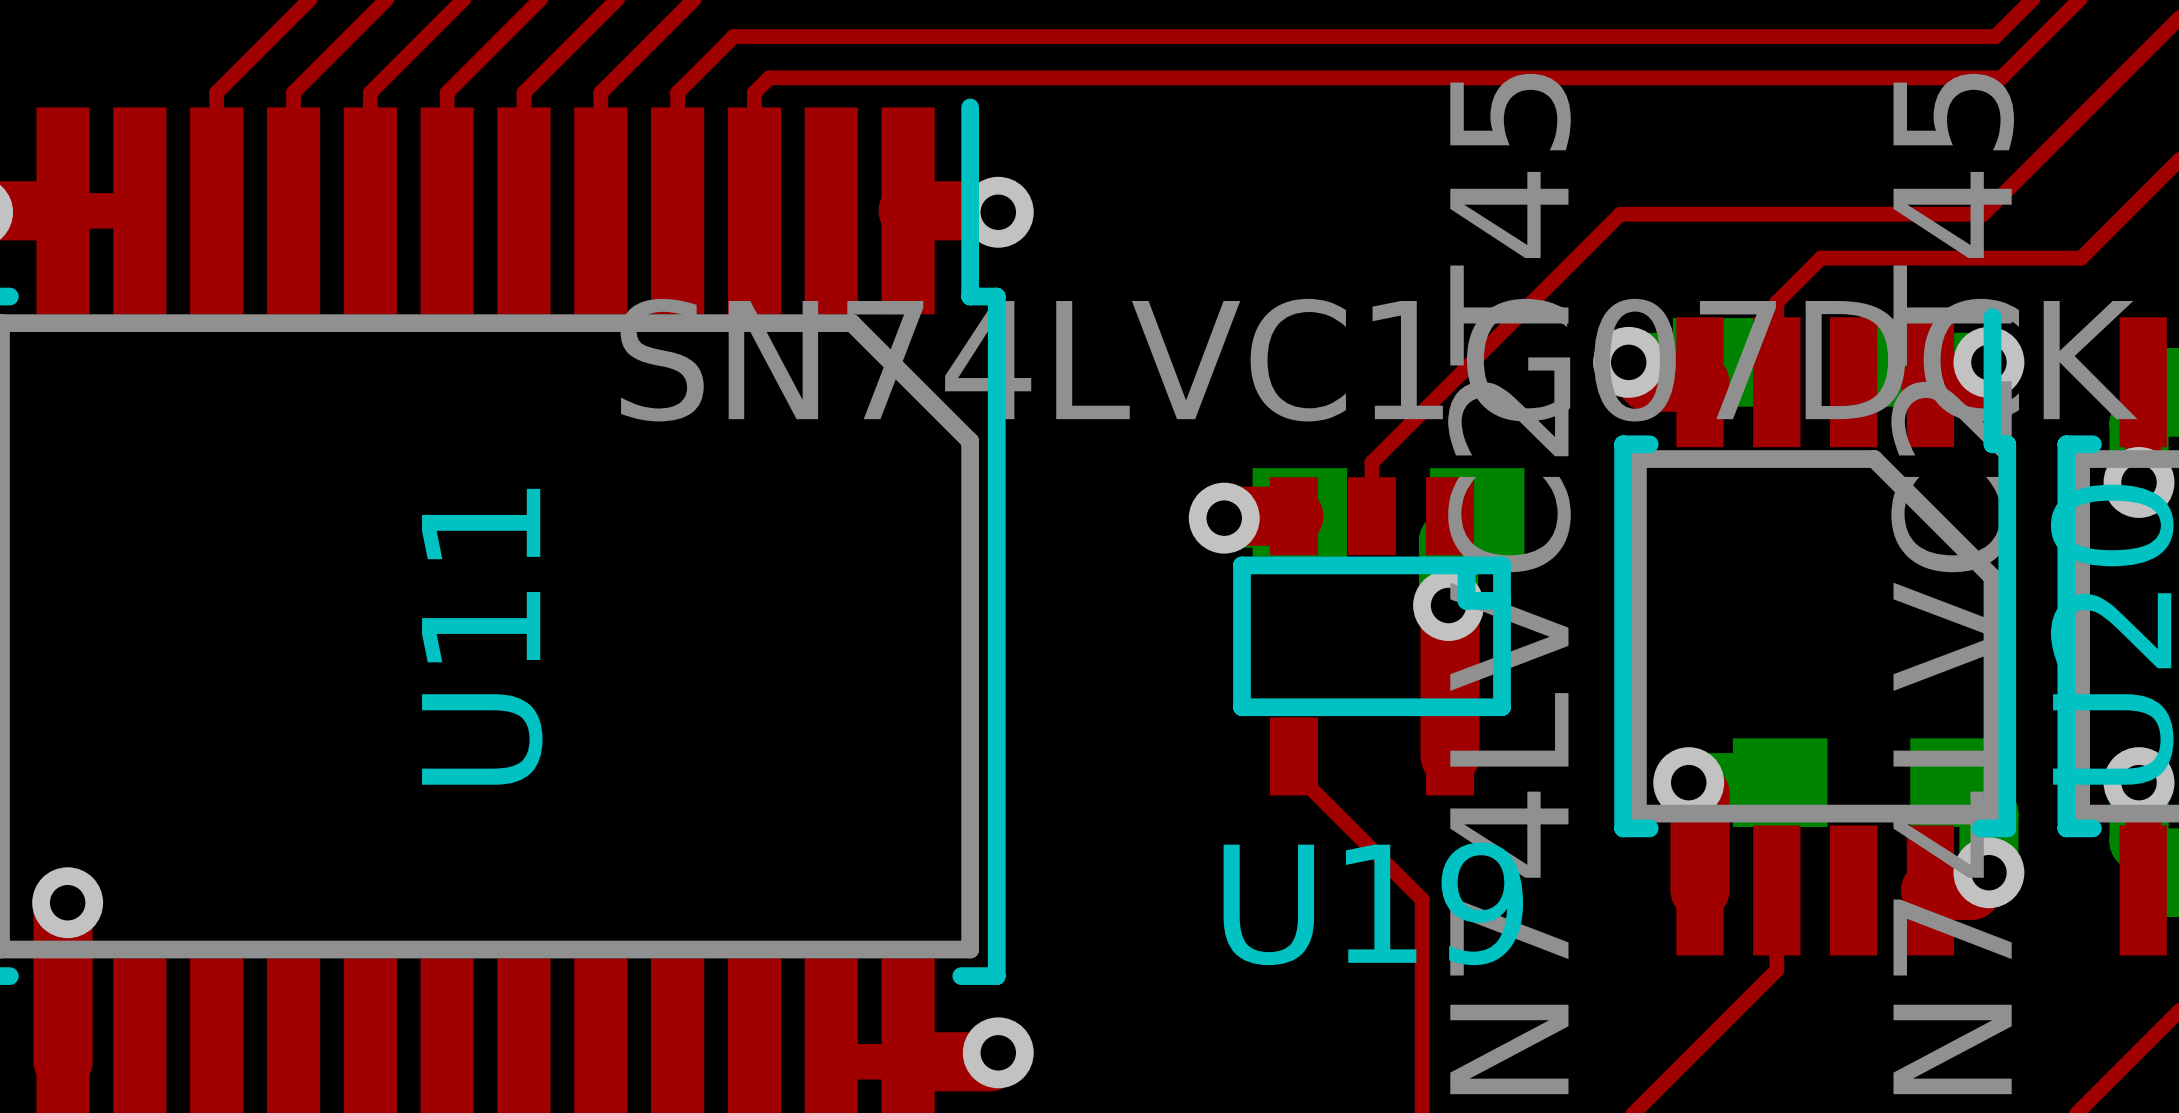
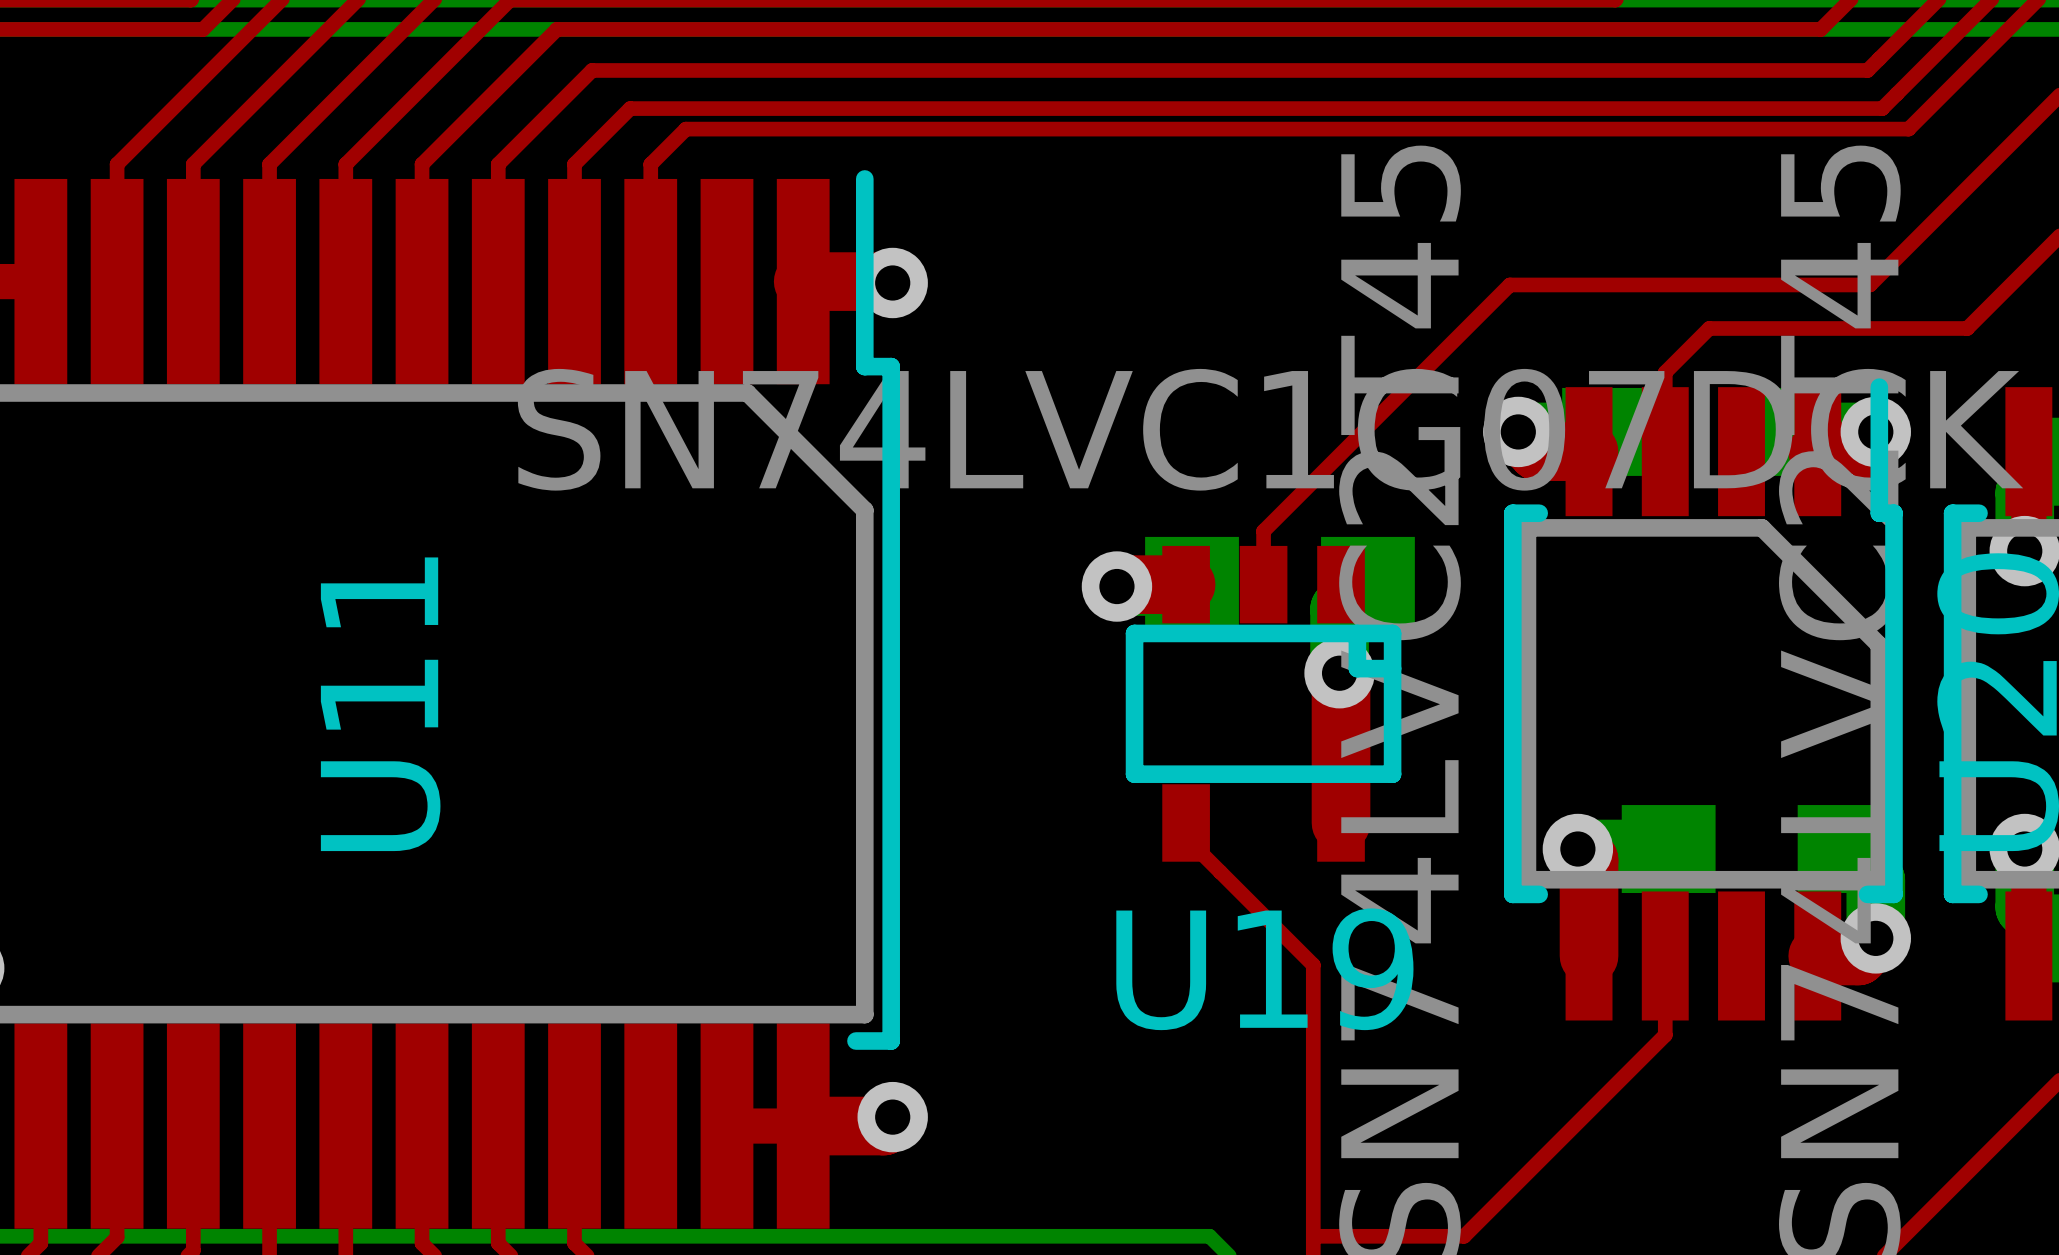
top track: (2022, 57) (2001, 77) (769, 77) -> (1908, 129) (685, 129) (665, 149)

